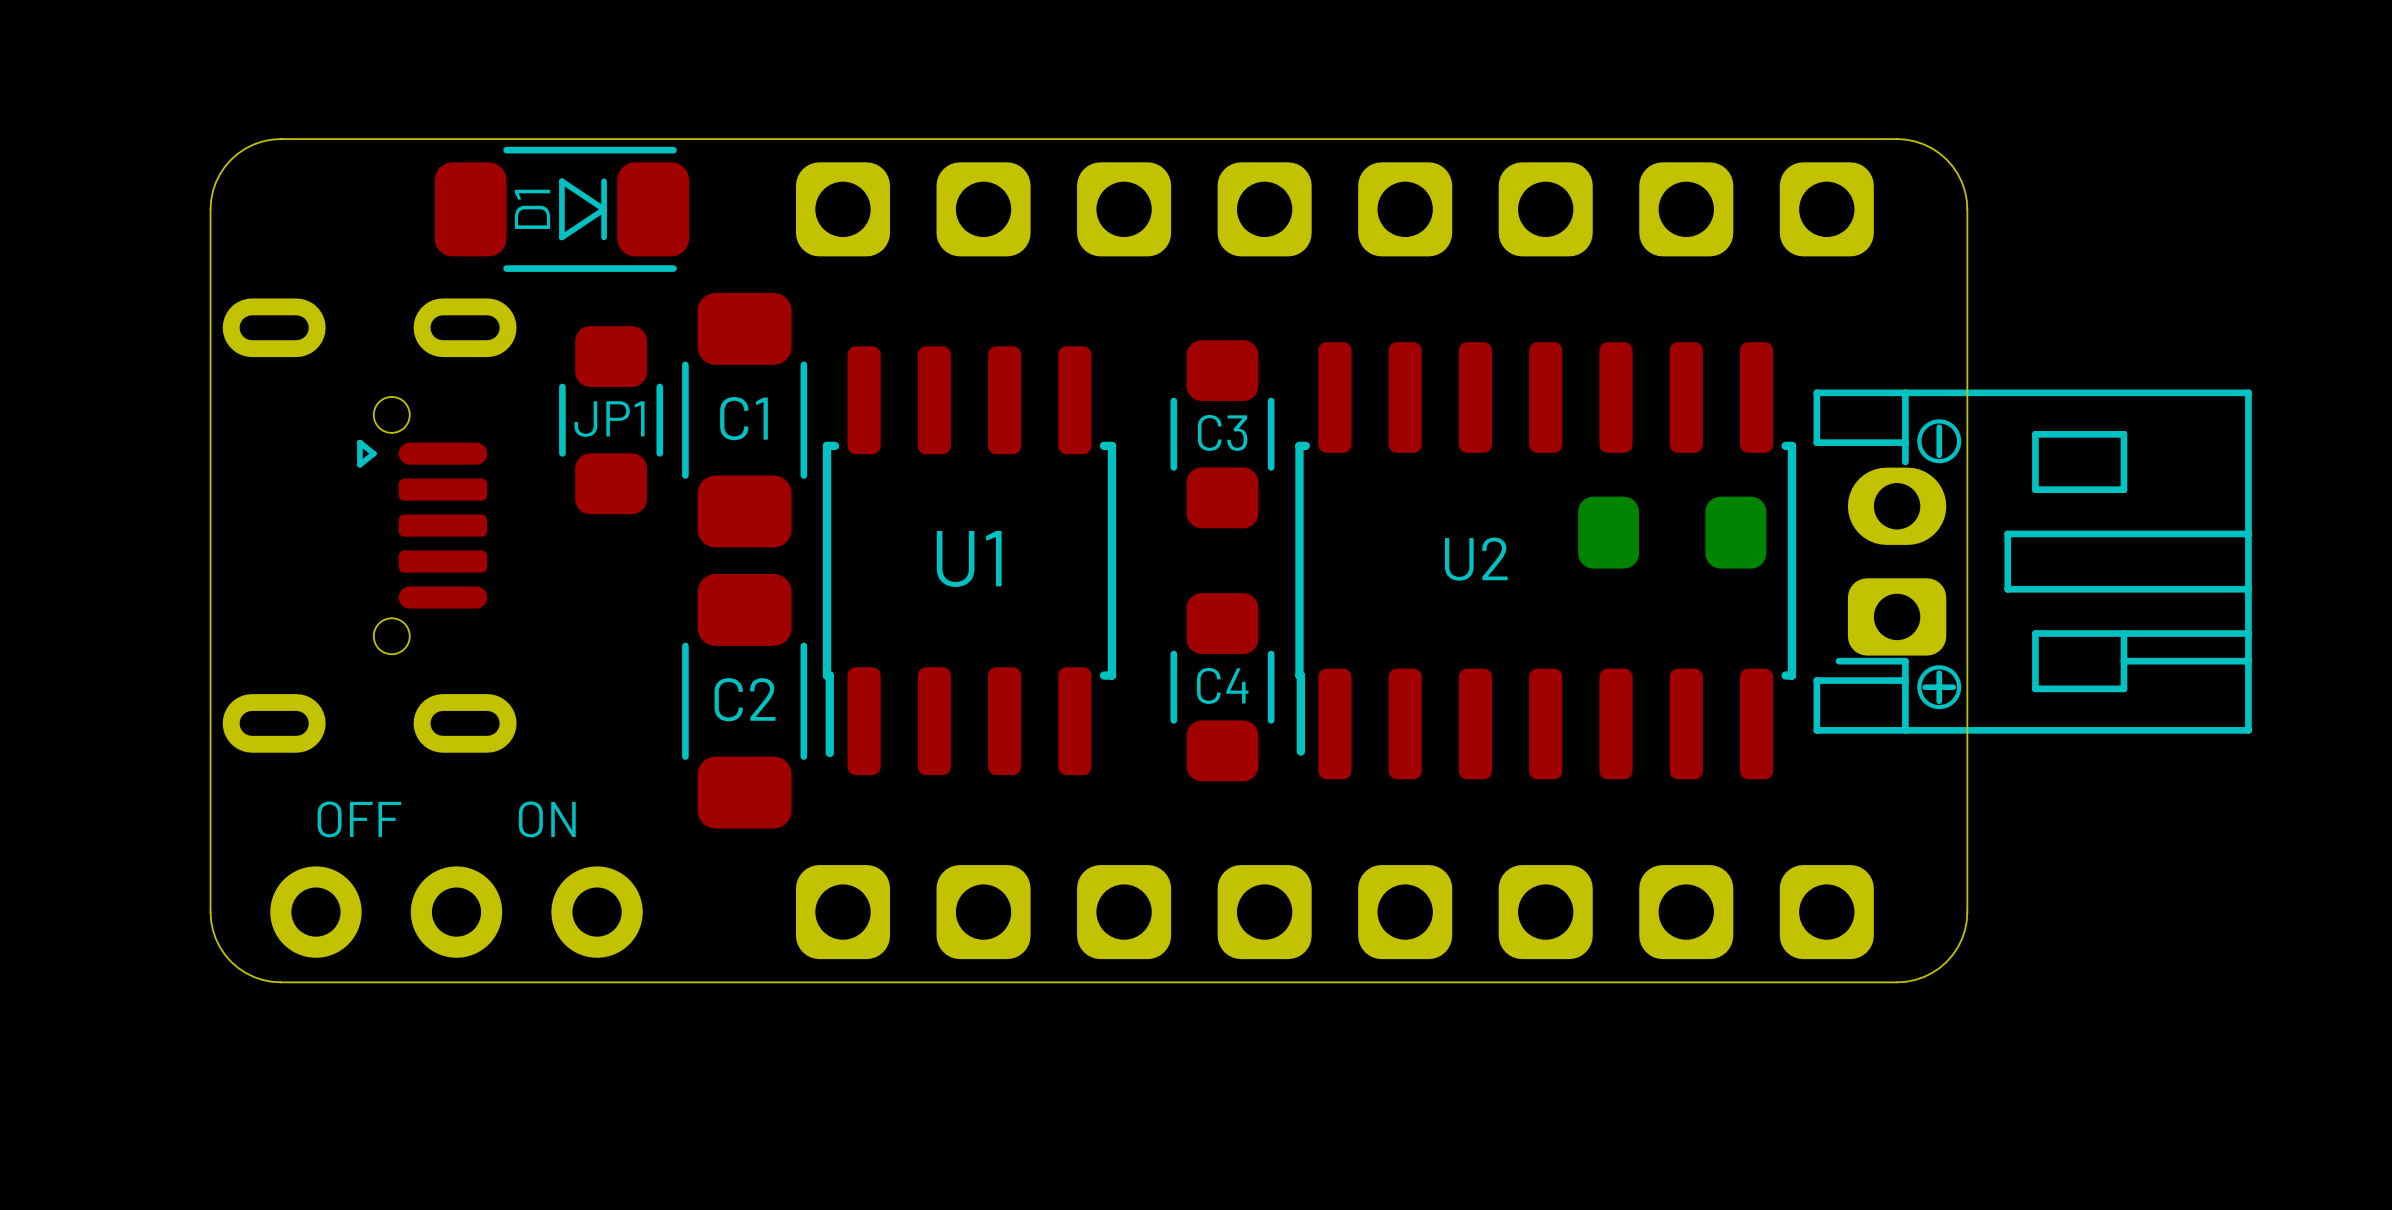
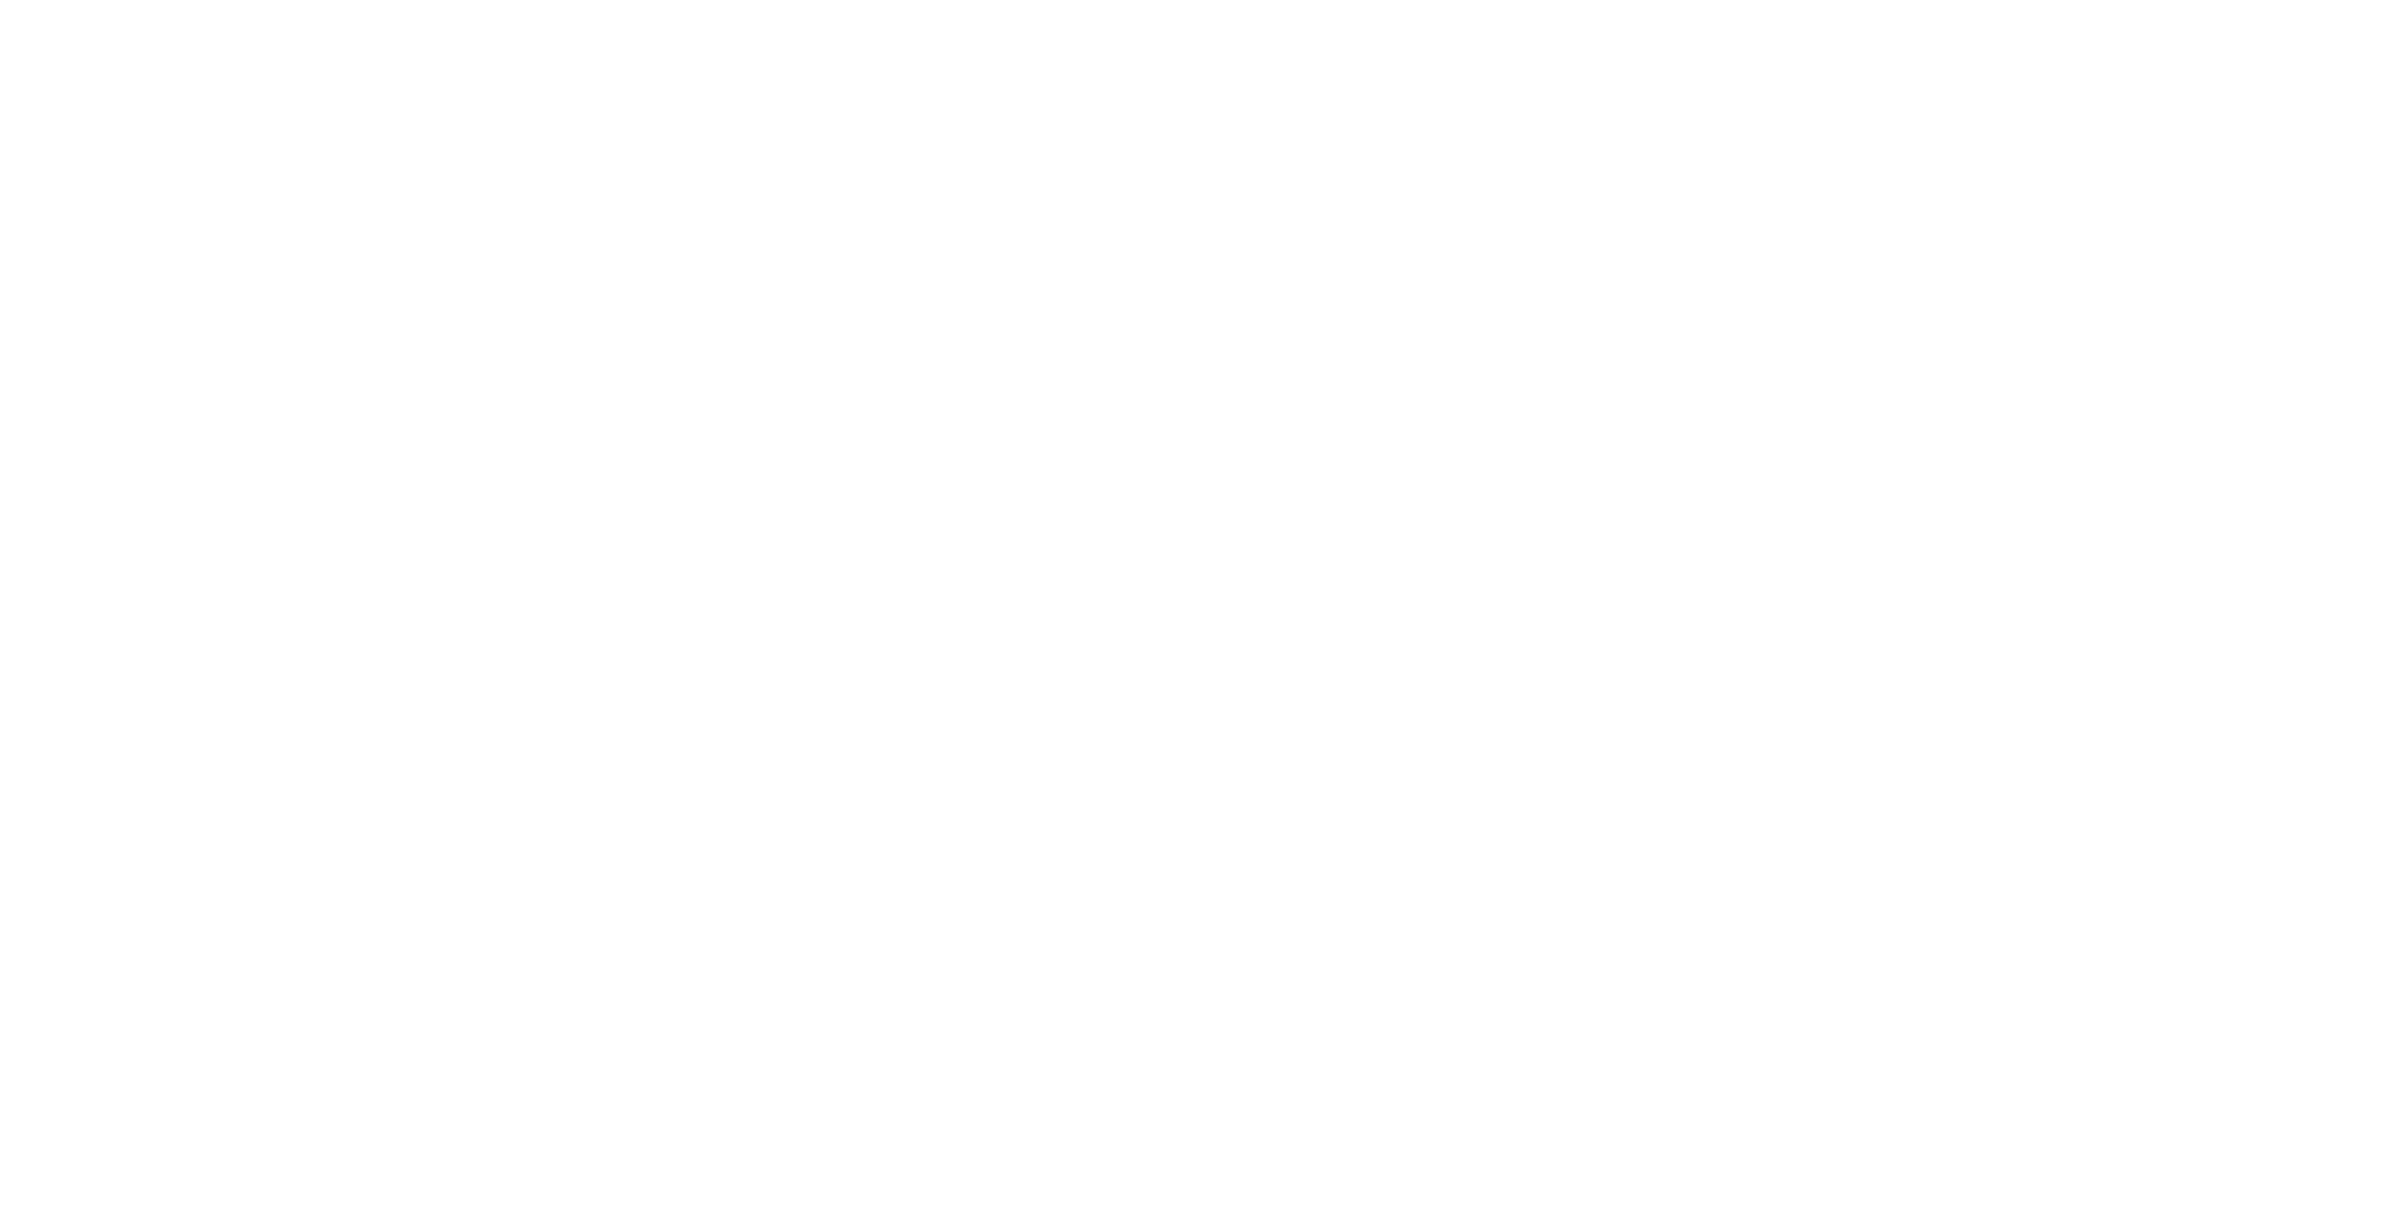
board edge: (280, 139) (1897, 139) (1923, 144) (1939, 153) (1952, 166) (1964, 191) (1967, 209) (1967, 912) (1962, 938) (1946, 961) (1932, 972) (1915, 979) (1897, 982) (280, 982) (253, 977) (238, 967) (219, 947) (212, 930) (210, 912) (210, 209) (215, 182) (231, 159) (253, 144) (280, 139) -> none
D1: (561, 209) -> none
part: (843, 209) -> none
part: (983, 209) -> none
part: (1124, 209) -> none
part: (1264, 209) -> none
part: (1616, 209) -> none
JP1: (611, 420) -> none
C1: (744, 420) -> none
C3: (1222, 434) -> none
part: (369, 525) -> none
part: (1672, 532) -> none
U1: (969, 560) -> none
U2: (1545, 560) -> none
part: (2032, 561) -> none
C4: (1222, 687) -> none
C2: (744, 701) -> none
text: OFF (359, 819) -> none
text: ON (547, 819) -> none
part: (456, 912) -> none
part: (843, 912) -> none
part: (983, 912) -> none
part: (1124, 912) -> none
part: (1264, 912) -> none
part: (1616, 912) -> none

